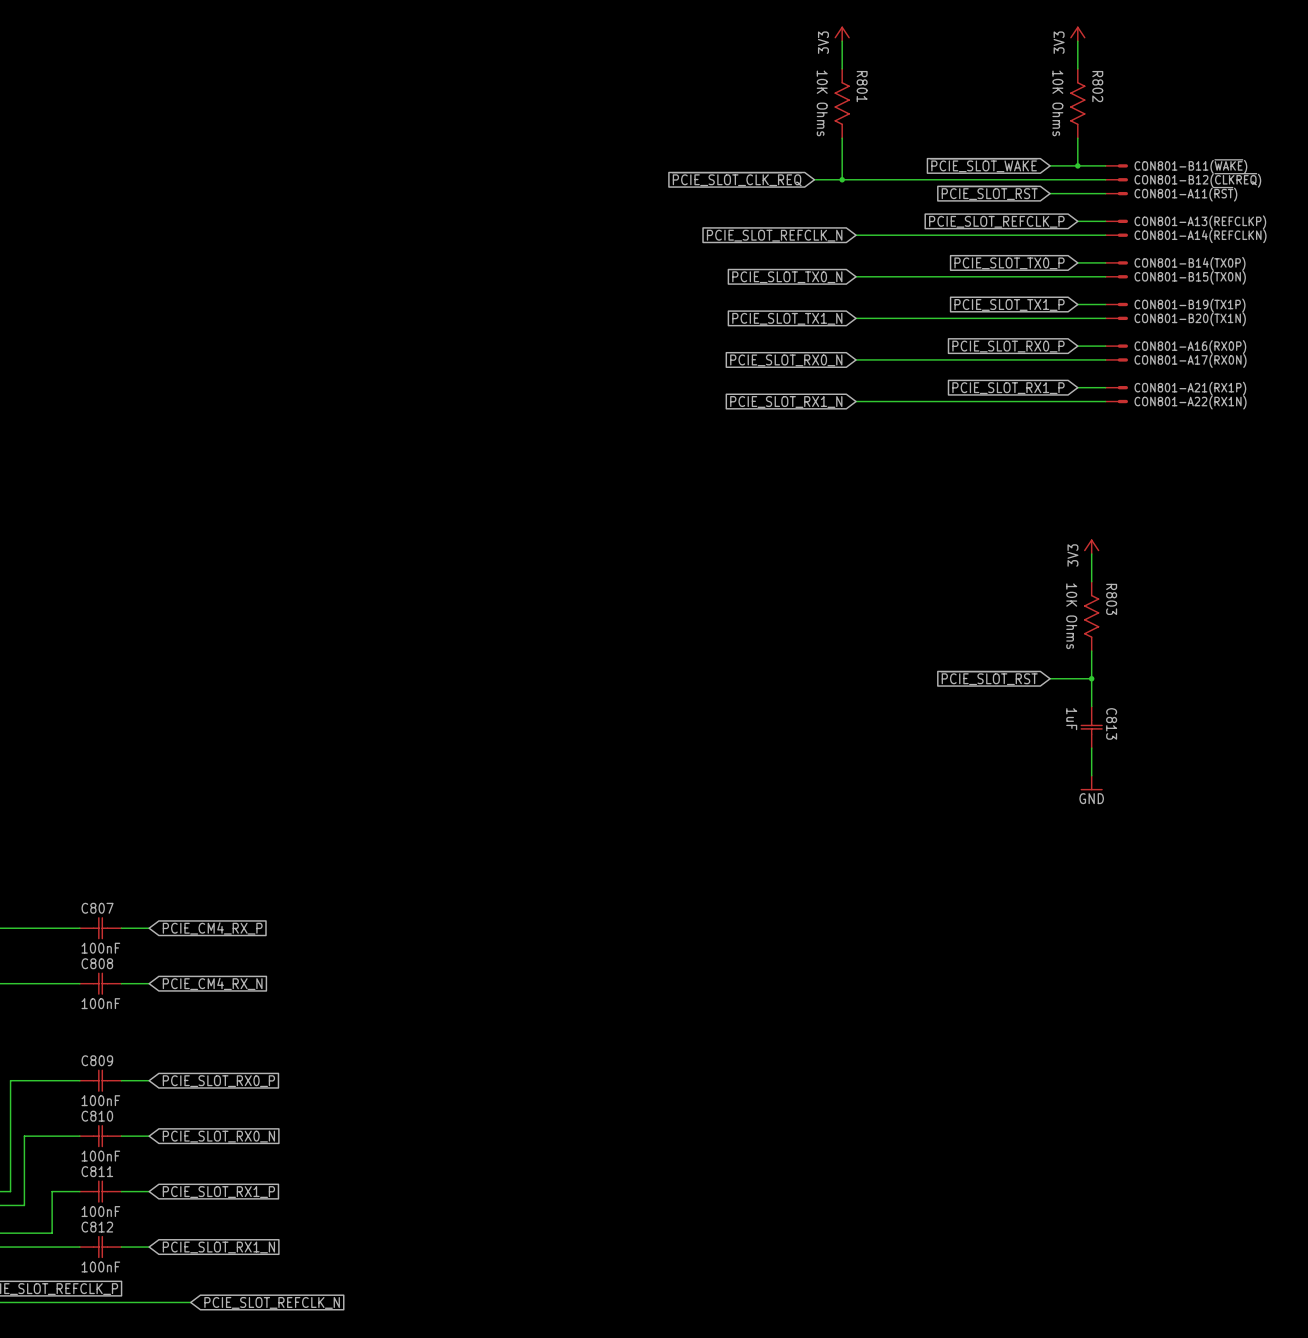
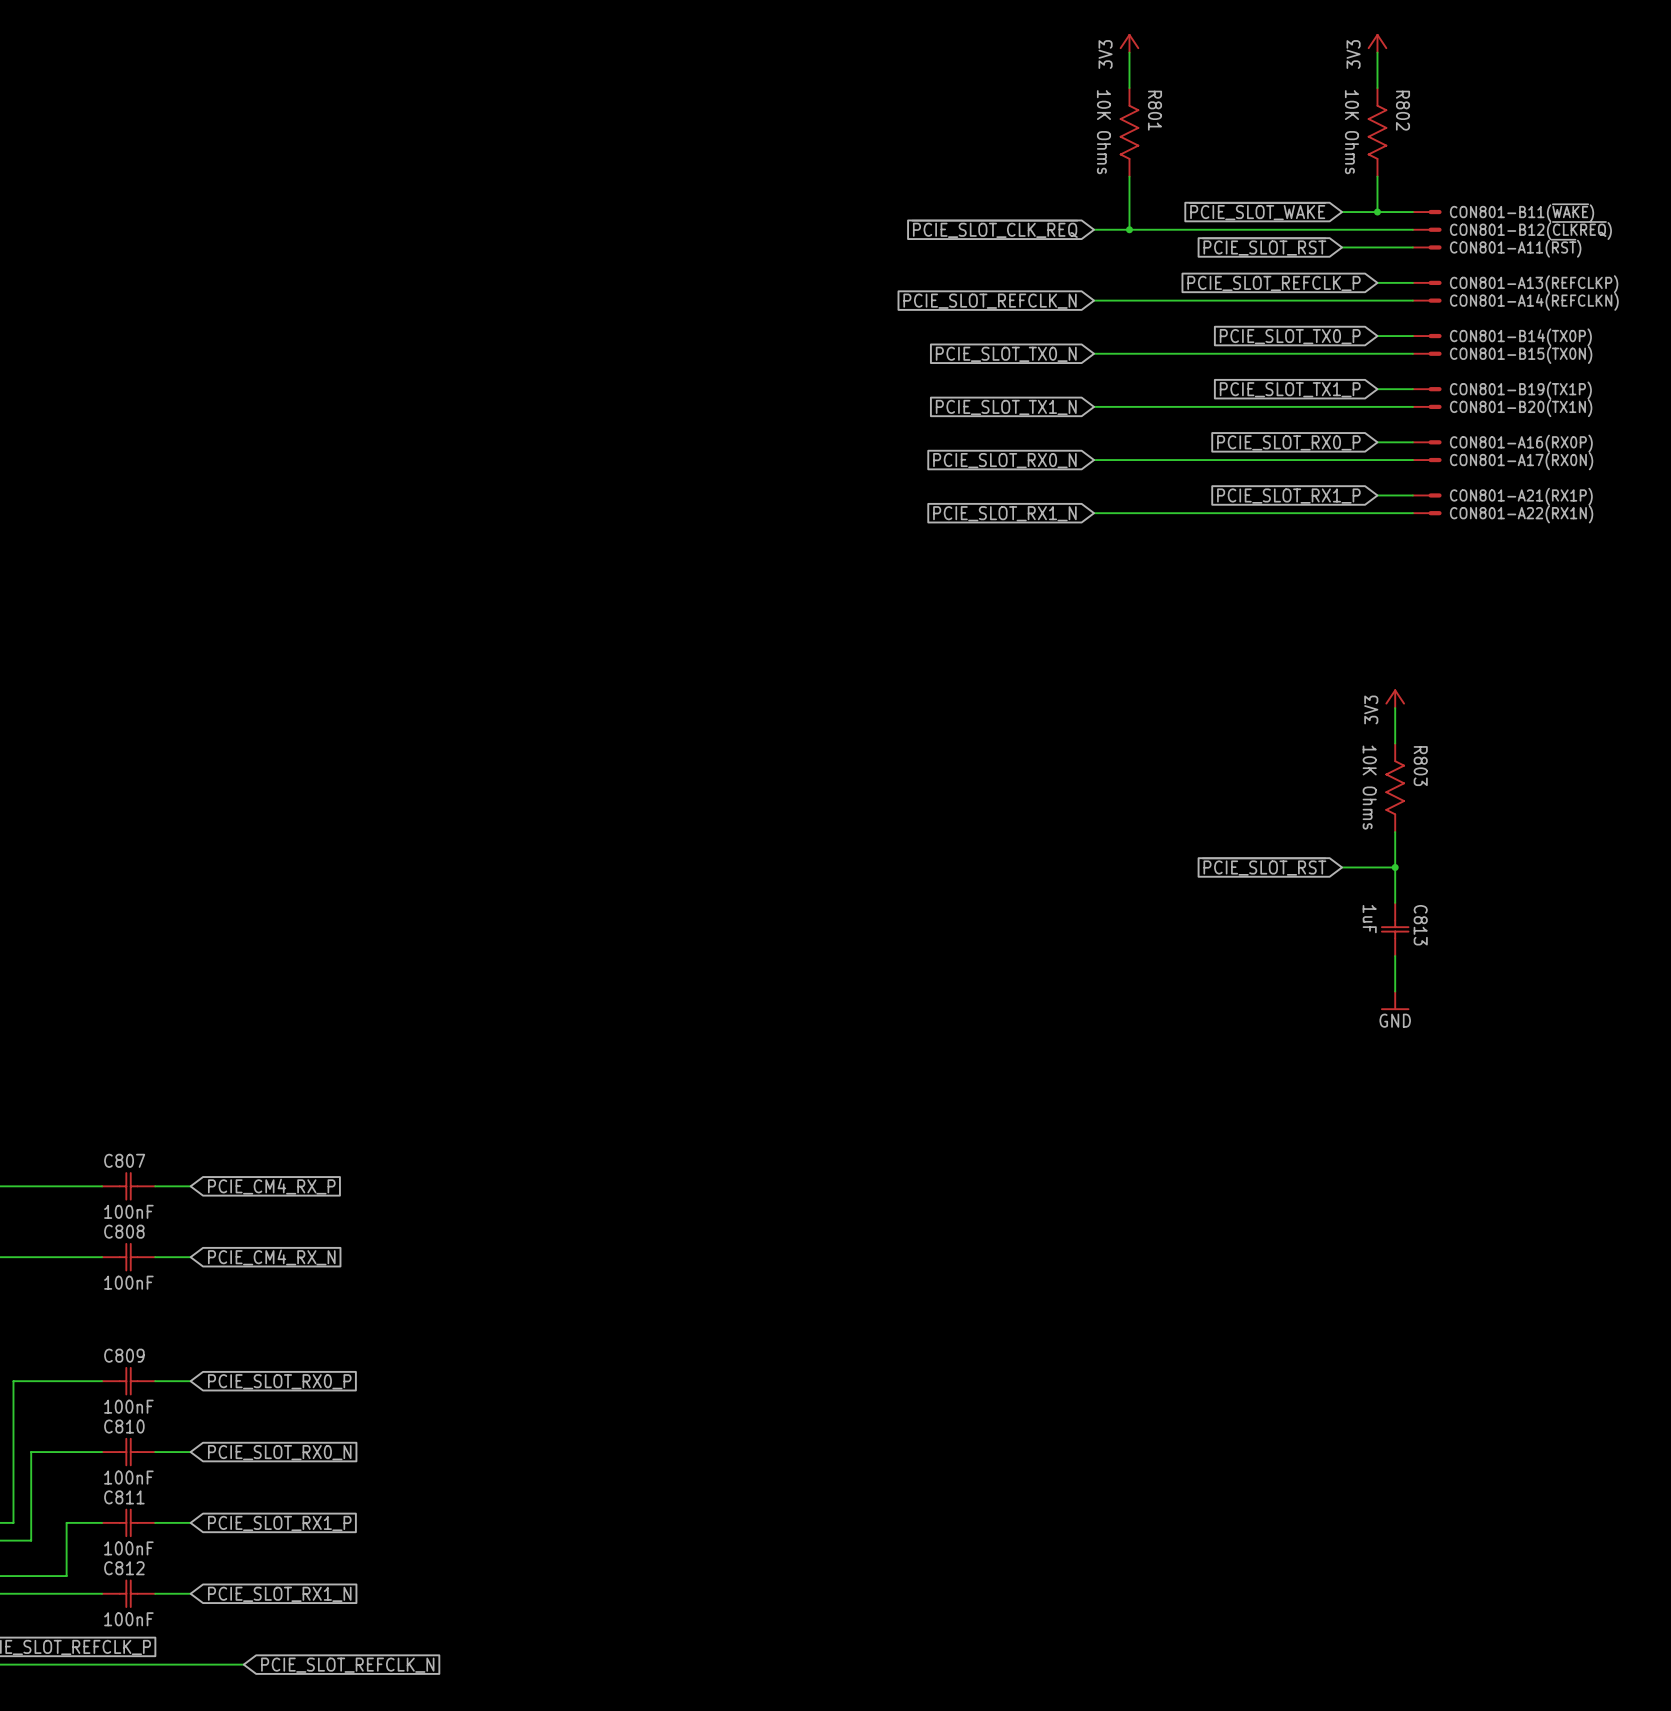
power symbol position: 3V3 (842, 33) -> 3V3 (1129, 43)
wire: (842, 41) (842, 68) -> (1129, 52) (1129, 88)
R801 position: (842, 103) -> (1129, 132)
wire: (842, 138) (842, 179) -> (1129, 176) (1129, 229)
global label position: ~{PCIE_SLOT_CLK_REQ} (736, 179) -> ~{PCIE_SLOT_CLK_REQ} (994, 228)
wire: (814, 179) (856, 179) -> none
junction: (842, 179) -> none
junction: none -> (1129, 229)

